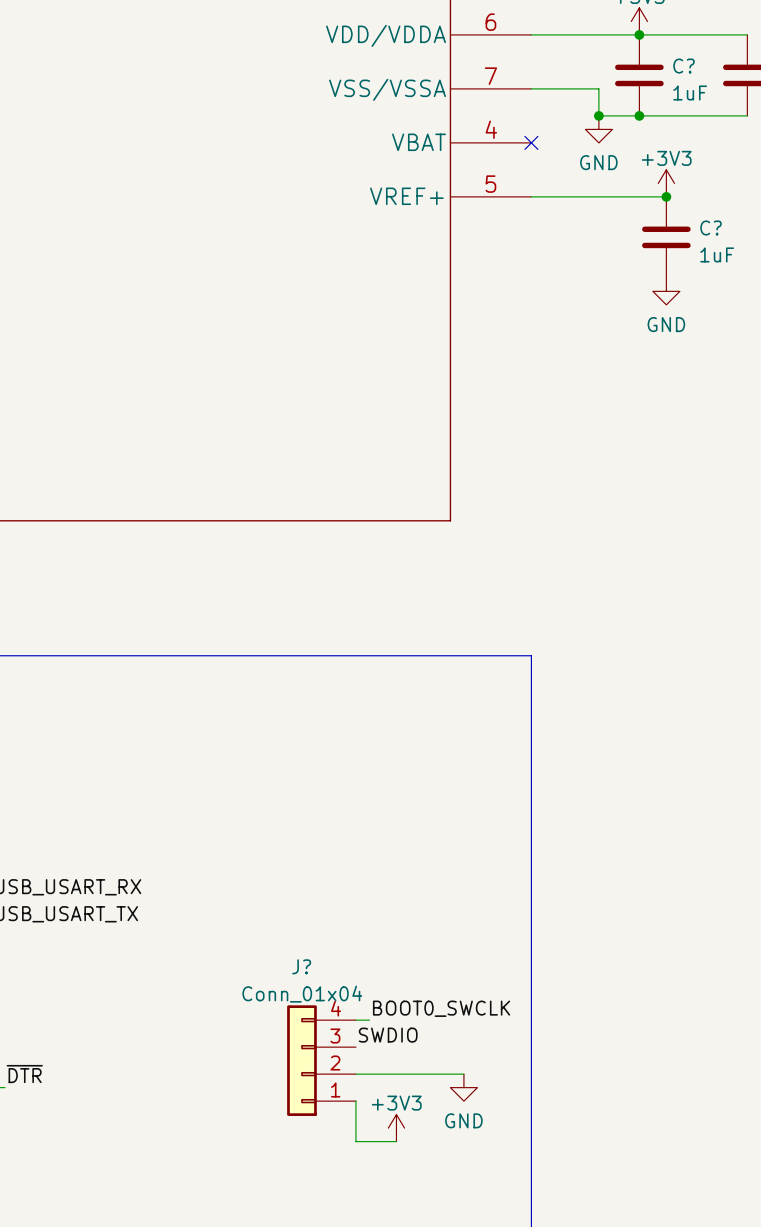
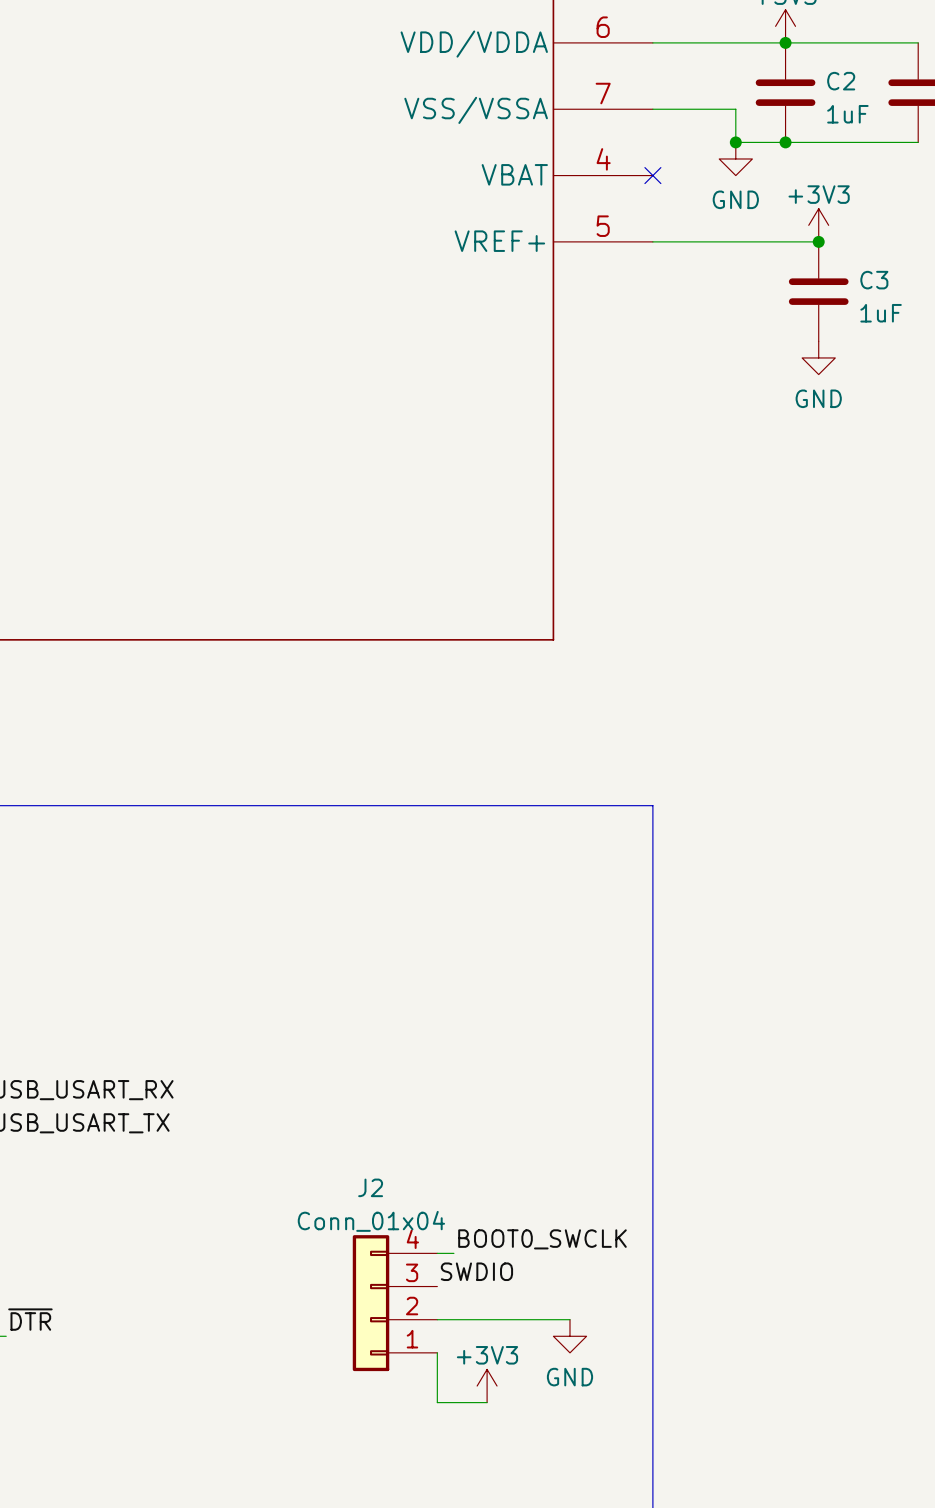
C? name: C? (684, 66) -> C2 (841, 81)
C? name: C? (711, 228) -> C3 (874, 280)
J? name: J? (301, 966) -> J2 (370, 1187)

